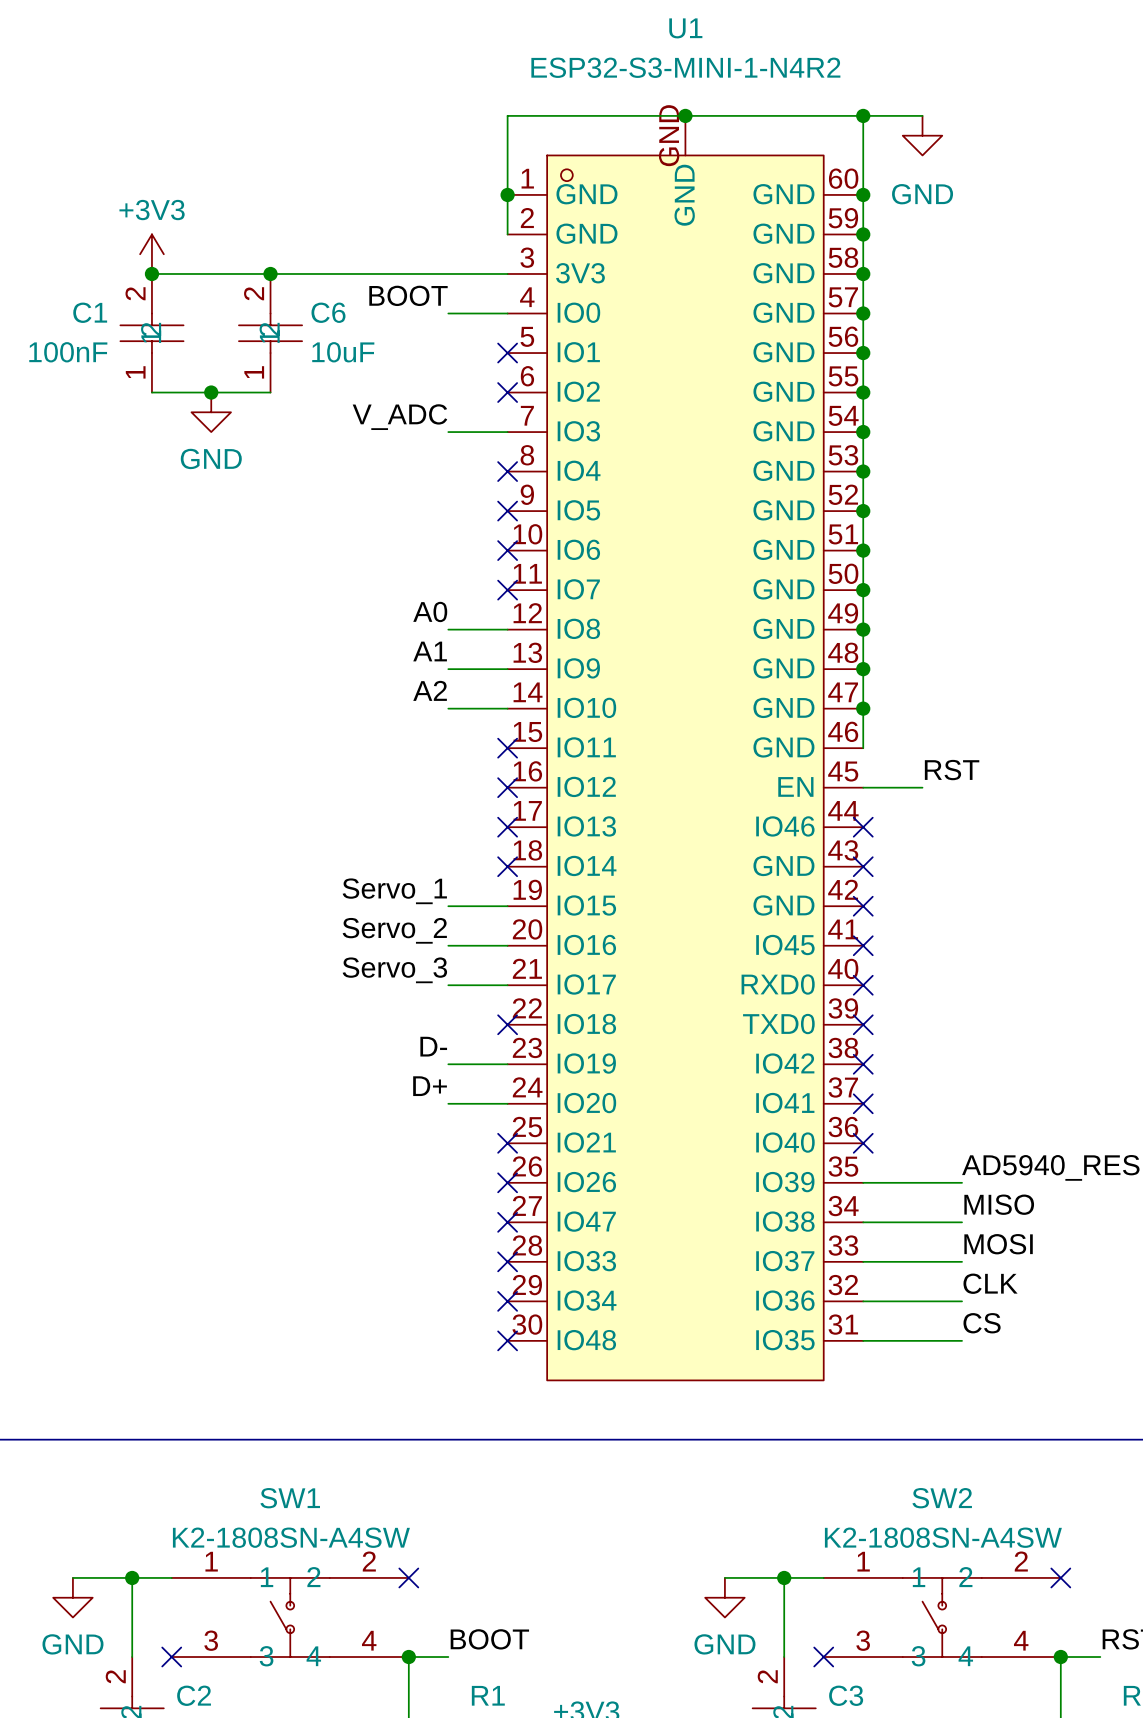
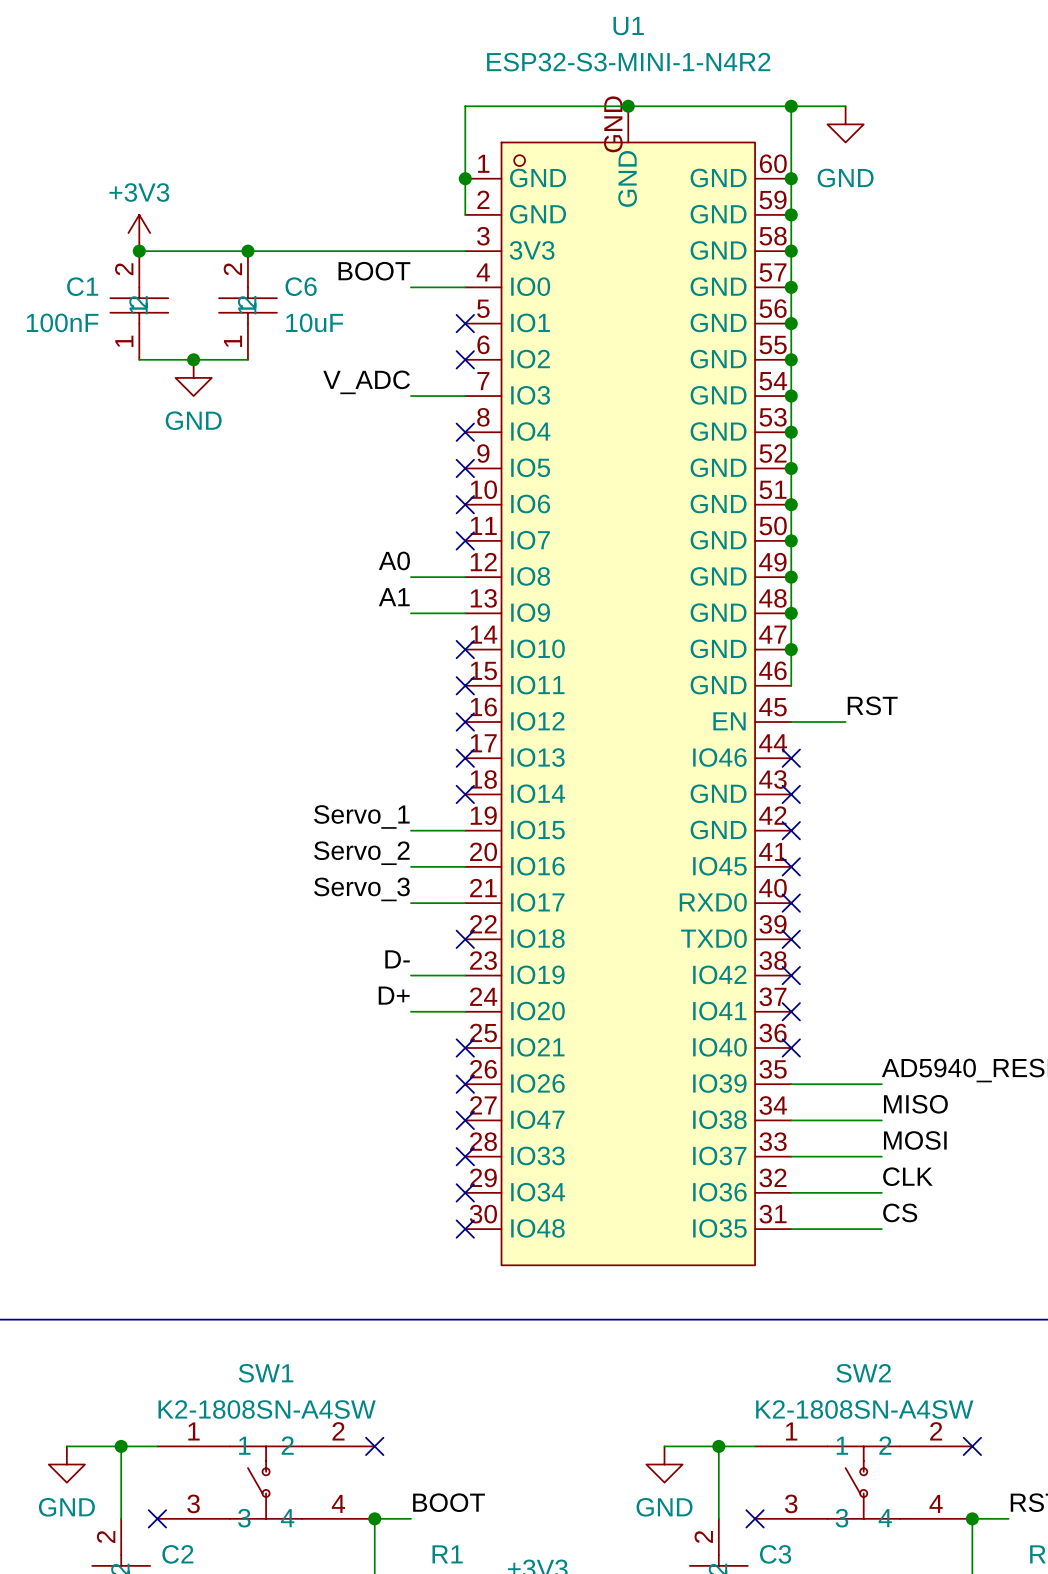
label: A2 (430, 690) -> none
wire: (448, 708) (507, 708) -> none
no-connect mark: none -> (465, 649)

